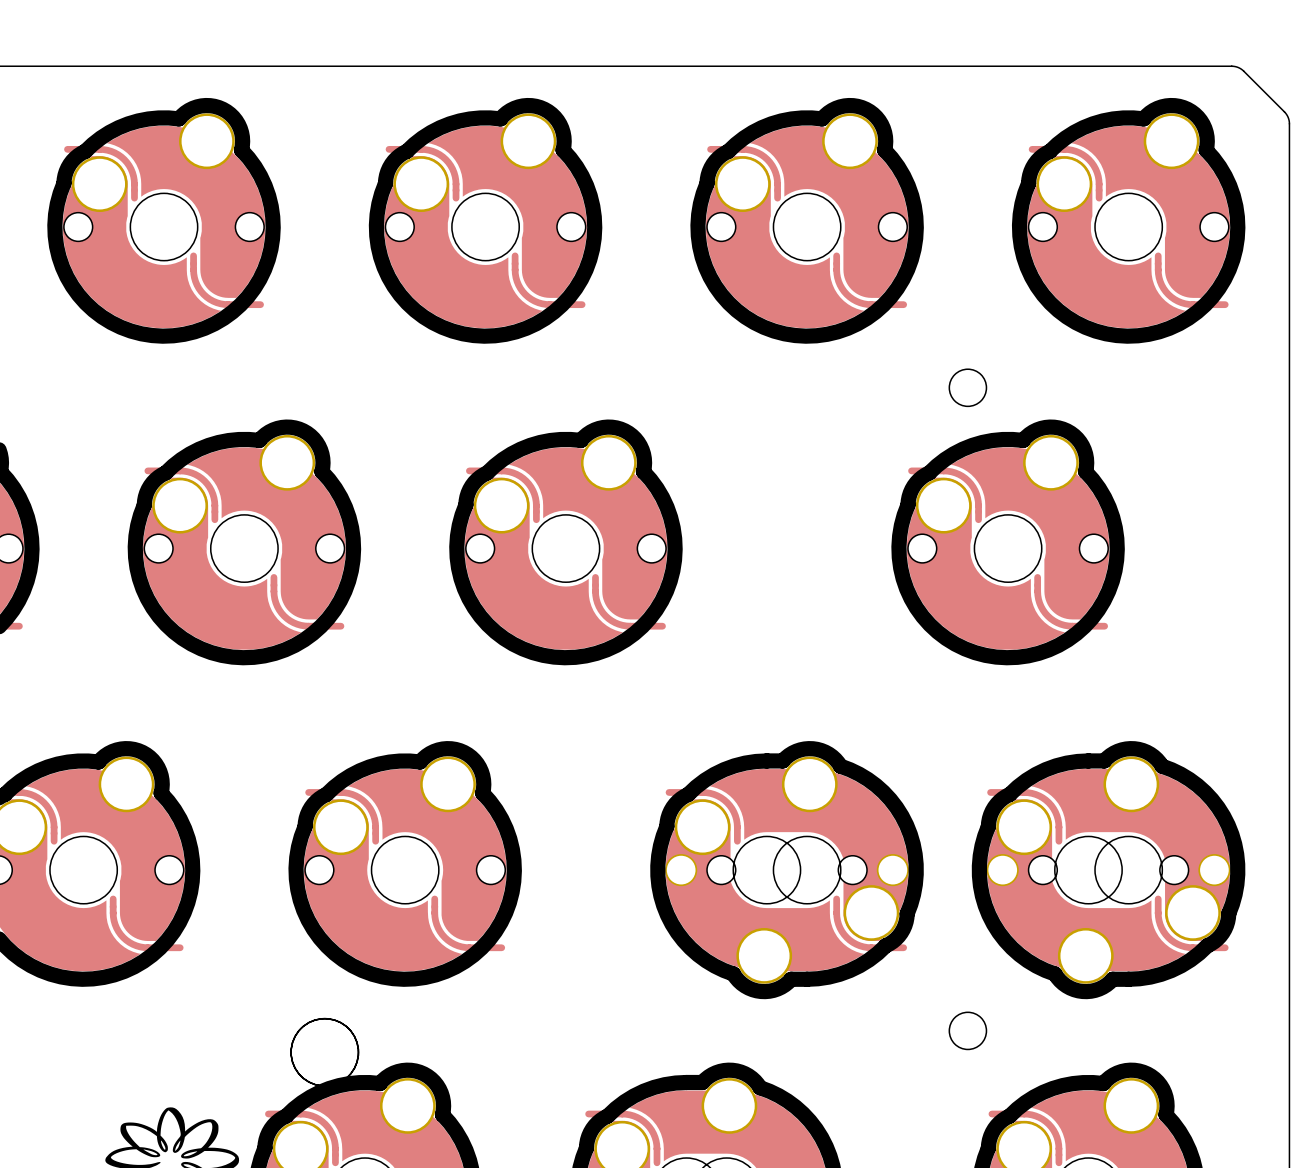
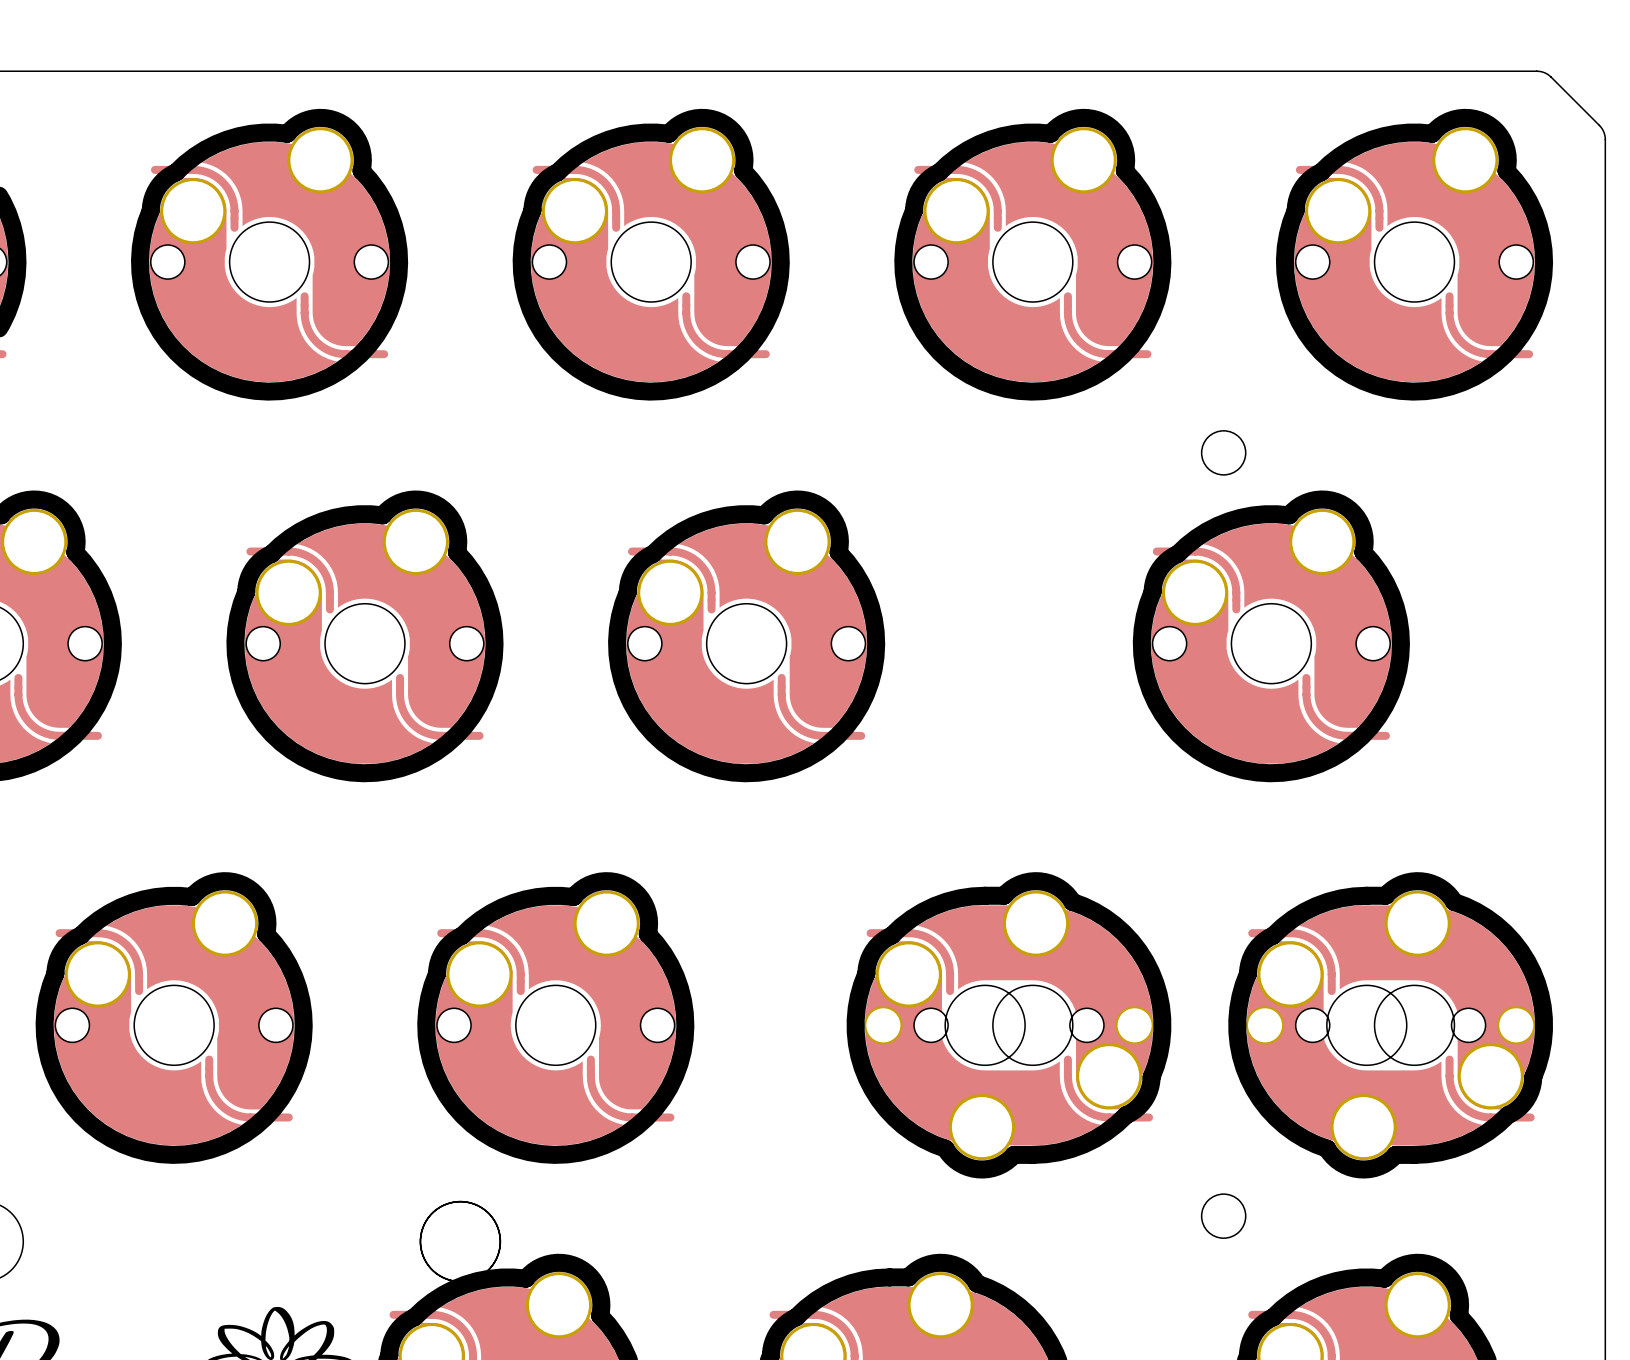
part rotation: 0° (787, 870) -> 180° (1008, 1025)
part rotation: 0° (1108, 870) -> 180° (1390, 1025)

